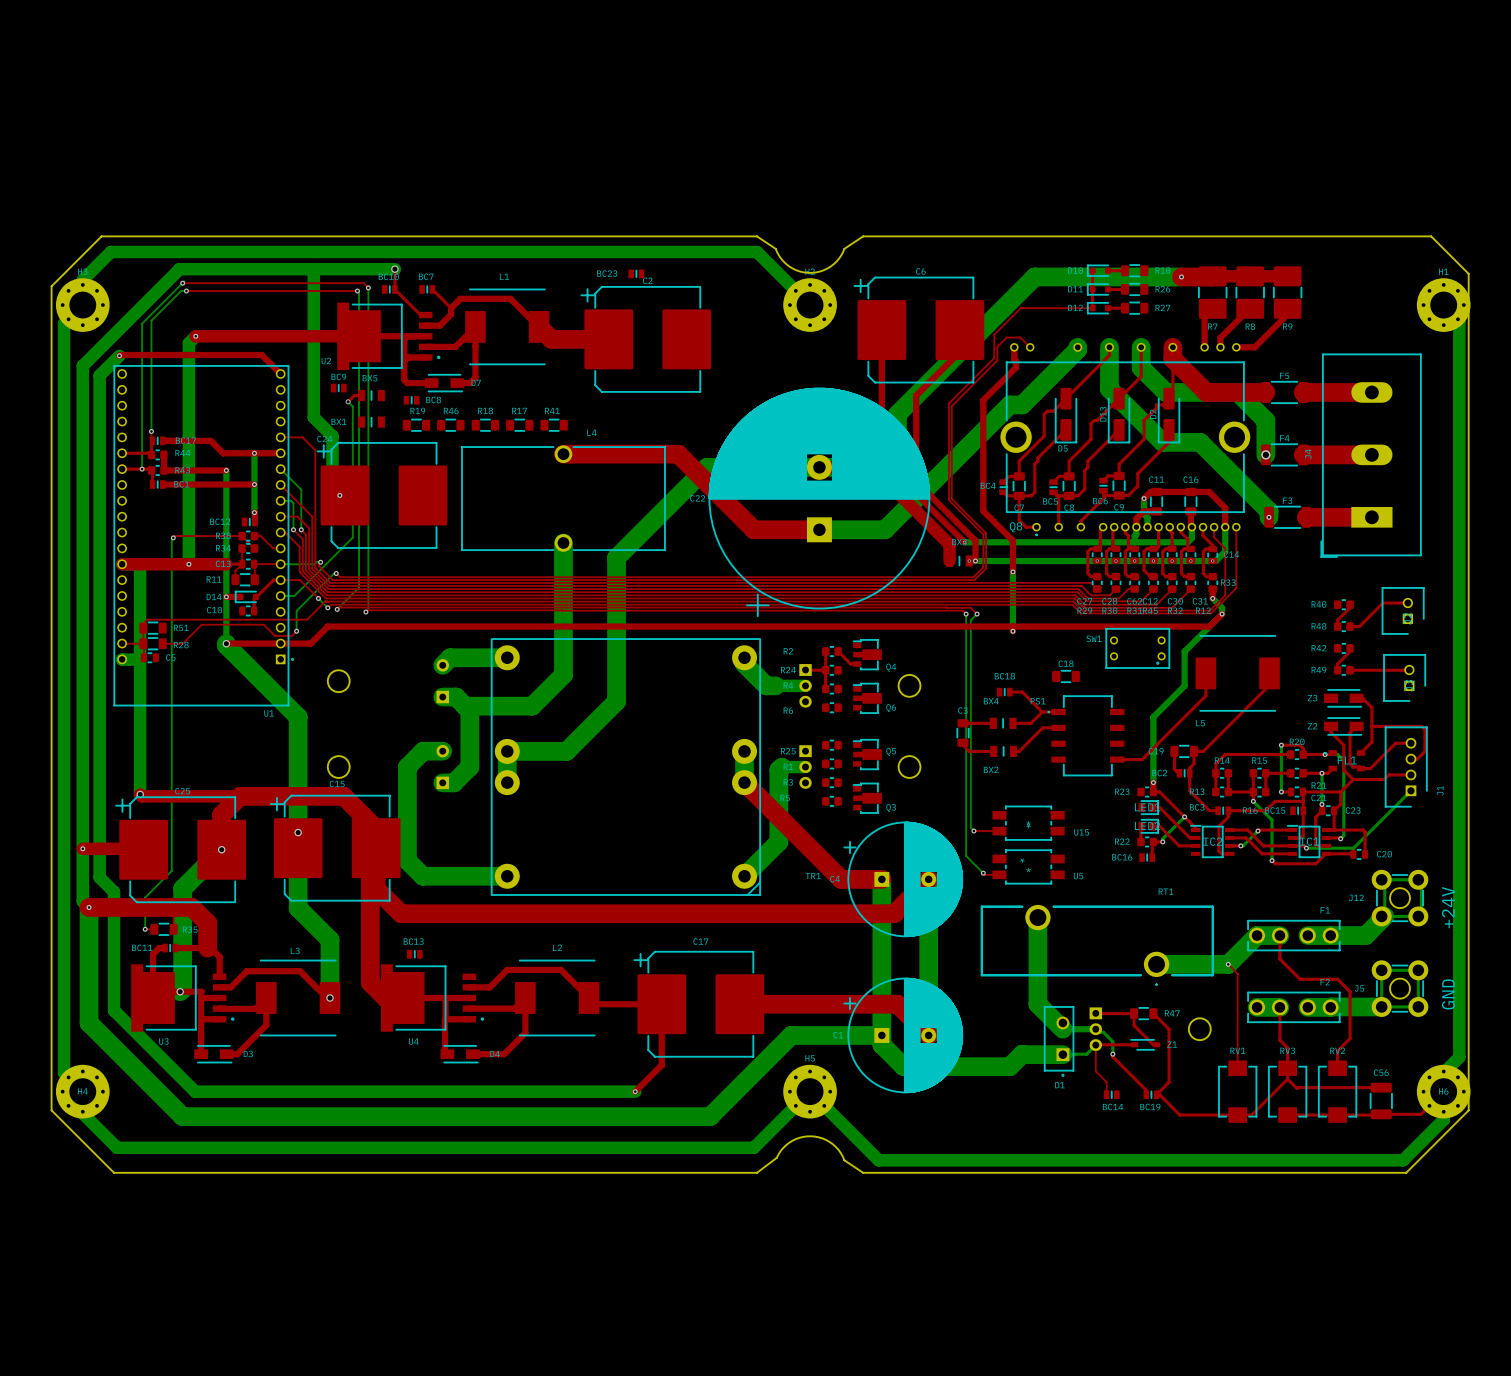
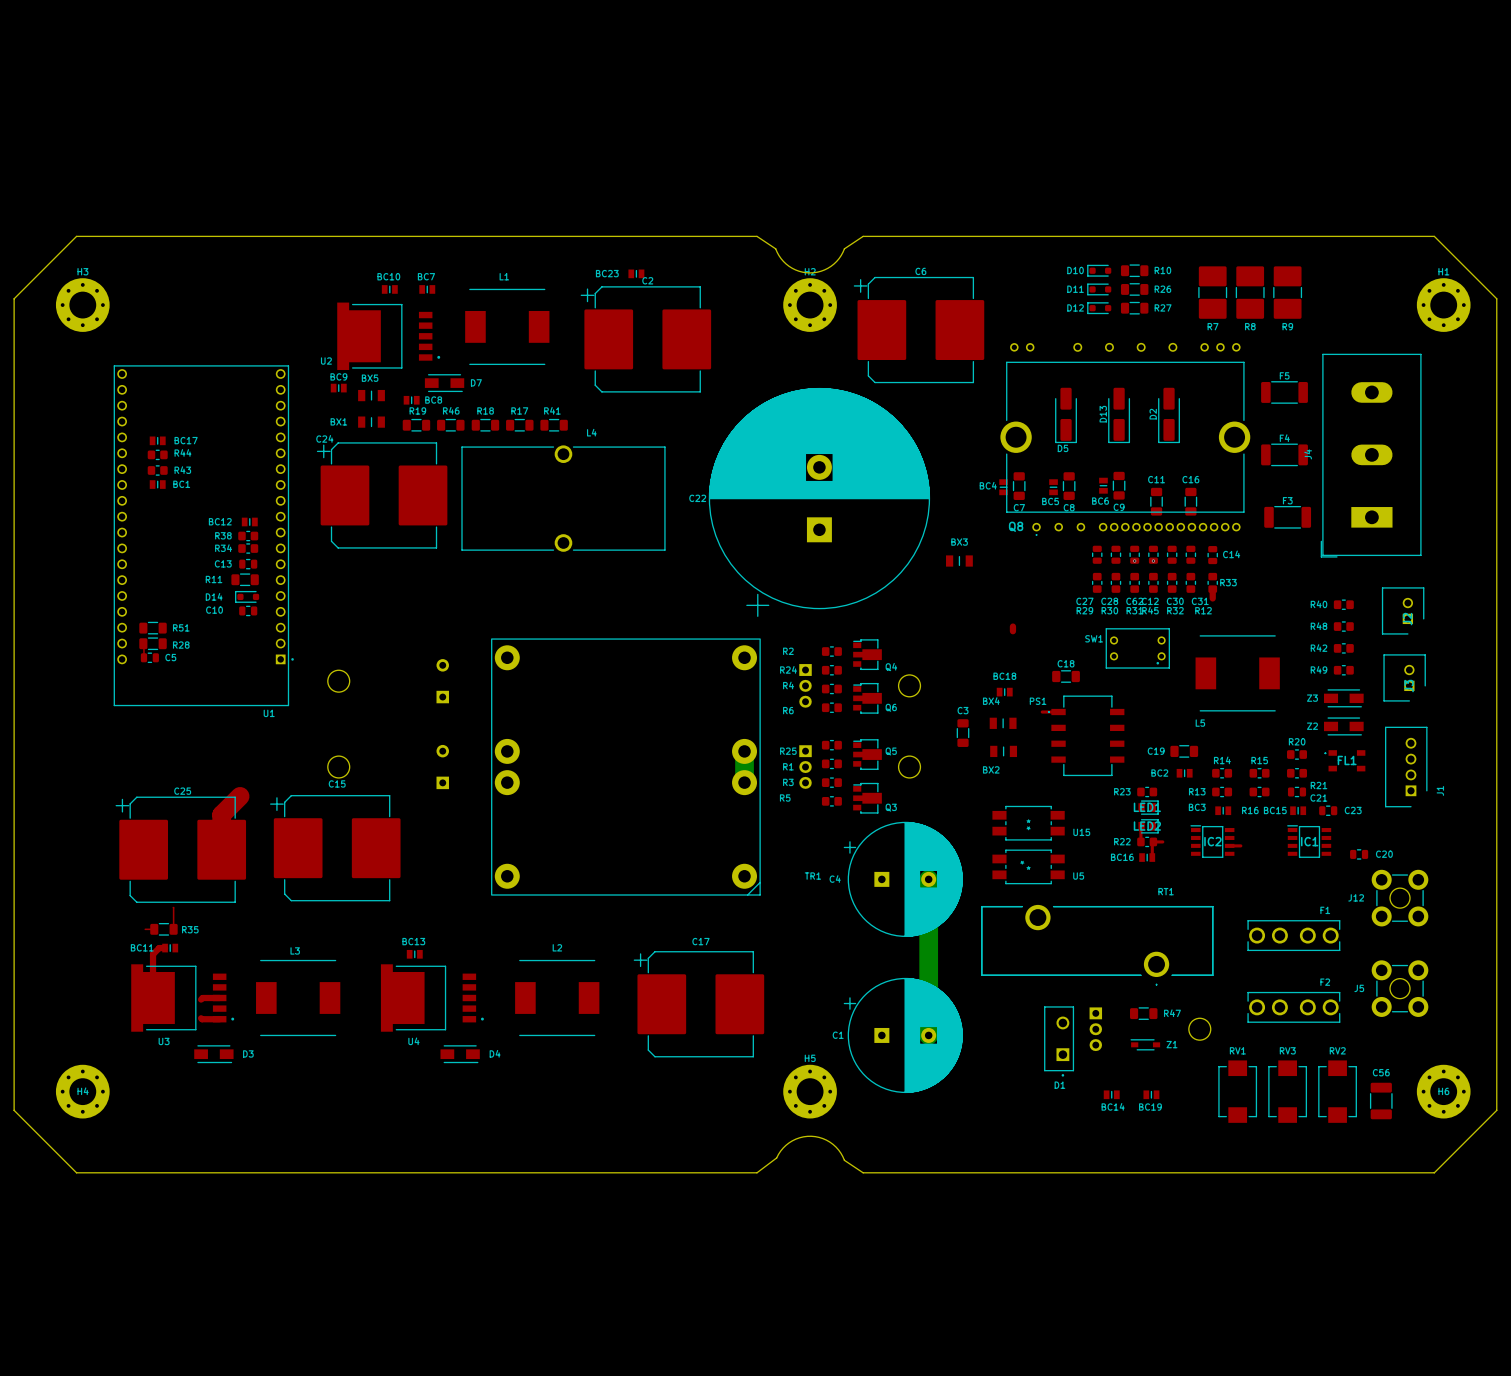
board edge: (101, 236) (51, 286) (51, 1110) (114, 1172) -> (101, 236) (76, 236) (14, 298) (14, 1110) (76, 1172) (114, 1172)
board edge: (1431, 236) (1468, 273) (1468, 1110) (1406, 1172) -> (1431, 236) (1434, 236) (1496, 298) (1496, 1110) (1434, 1172) (1406, 1172)
bottom track: (313, 269) (313, 417) (332, 436) (332, 488) (339, 495) -> none
top track: (394, 269) (394, 289) (420, 315) (425, 315) -> none
bottom track: (394, 269) (179, 269) (82, 365) (82, 901) (89, 907) (89, 1022) (182, 1116) (710, 1116) (791, 1035) (881, 1035) -> none
via: (394, 269) -> none
top track: (1092, 270) (1092, 308) (1020, 308) (994, 334) (994, 358) (948, 403) (948, 500) (983, 534) (983, 567) (973, 577) (339, 577) (336, 573) -> none
top track: (1108, 270) (1125, 270) -> none
bottom track: (1181, 276) (1034, 276) (897, 414) (897, 451) (881, 467) (707, 467) (616, 557) (616, 701) (566, 751) (507, 751) (507, 782) -> none
via: (1181, 276) -> none
top track: (1287, 276) (1181, 276) -> none
top track: (182, 283) (363, 283) (368, 287) -> none
bottom track: (182, 283) (184, 281) (142, 323) (142, 469) -> none
via: (182, 283) -> none
bottom track: (368, 287) (368, 609) (365, 612) -> none
via: (368, 287) -> none
top track: (432, 289) (451, 308) -> none
top track: (1108, 289) (1125, 289) -> none
top track: (186, 291) (357, 291) -> none
bottom track: (186, 291) (181, 291) (151, 320) (151, 431) -> none
via: (186, 291) -> none
bottom track: (357, 291) (359, 292) (359, 587) (337, 609) -> none
via: (357, 291) -> none
bottom track: (810, 305) (757, 251) (110, 251) (82, 280) (82, 305) (64, 323) (64, 1072) (82, 1091) (82, 1113) (117, 1147) (753, 1147) (810, 1091) (878, 1160) (1403, 1160) (1443, 1119) (1443, 1072) (1459, 1057) (1459, 320) (1443, 305) -> none
top track: (451, 308) (460, 298) (510, 298) (551, 339) (608, 339) -> none
top track: (451, 308) (451, 314) (439, 325) (425, 325) -> none
top track: (1108, 308) (1125, 308) -> none
top track: (1212, 308) (1204, 316) (1204, 347) -> none
top track: (1250, 308) (1220, 337) (1220, 347) -> none
top track: (1287, 308) (1287, 314) (1254, 347) (1236, 347) -> none
top track: (881, 330) (881, 459) (964, 542) -> none
top track: (959, 330) (959, 351) (916, 395) (916, 481) (975, 540) (975, 561) -> none
top track: (195, 336) (425, 336) -> none
bottom track: (195, 336) (188, 343) (188, 564) -> none
via: (195, 336) -> none
top track: (407, 336) (404, 339) (404, 379) (407, 383) (431, 383) -> none
top track: (425, 346) (455, 346) (475, 326) (475, 377) (469, 383) (457, 383) -> none
top track: (1014, 347) (1016, 367) (983, 400) (983, 511) (1012, 540) (1012, 571) -> none
top track: (1030, 347) (1020, 337) (1006, 337) (997, 346) (997, 360) (951, 406) (951, 498) (986, 533) (986, 568) (974, 580) (332, 580) (318, 566) (320, 562) -> none
bottom track: (1077, 347) (1077, 349) (1022, 404) (1009, 404) (884, 529) (819, 529) -> none
top track: (1109, 347) (1109, 355) (1053, 411) (1047, 411) (1044, 414) (1044, 436) (1019, 461) (1019, 476) (1009, 476) (1003, 482) -> none
bottom track: (1109, 347) (1109, 389) (1162, 442) (1200, 442) (1268, 511) (1268, 517) -> none
top track: (1141, 347) (1141, 376) (1097, 420) (1090, 423) (1090, 439) (1069, 461) (1069, 476) (1059, 476) (1053, 482) -> none
bottom track: (1141, 347) (1141, 367) (1165, 392) (1237, 392) (1265, 420) (1265, 454) -> none
top track: (119, 355) (261, 355) (280, 373) -> none
bottom track: (119, 355) (99, 375) (99, 877) (114, 891) (114, 1010) (195, 1091) (635, 1091) -> none
via: (119, 355) -> none
top track: (425, 357) (408, 357) (404, 361) -> none
top track: (1265, 392) (1206, 392) (1172, 358) (1172, 347) (1172, 391) (1162, 404) (1156, 404) (1156, 408) (1144, 420) (1144, 439) (1119, 464) (1119, 475) (1108, 475) (1103, 480) -> none
top track: (1303, 392) (1371, 392) -> none
top track: (361, 395) (354, 395) (348, 401) -> none
bottom track: (348, 401) (352, 406) (352, 537) (294, 595) (280, 595) -> none
via: (348, 401) -> none
top track: (1066, 429) (1037, 458) (1034, 464) (1034, 492) (1031, 495) (1007, 495) (1003, 492) -> none
top track: (1119, 429) (1087, 461) (1087, 467) (1084, 470) (1084, 489) (1078, 495) (1057, 495) (1053, 492) -> none
top track: (1169, 429) (1169, 442) (1137, 473) (1137, 486) (1128, 495) (1103, 495) (1103, 490) -> none
top track: (151, 431) (151, 454) (149, 453) (122, 453) -> none
via: (151, 431) -> none
top track: (280, 437) (302, 437) (315, 450) (315, 567) (330, 582) (1090, 582) (1097, 589) -> none
top track: (162, 440) (210, 440) (223, 453) -> none
top track: (223, 453) (280, 453) -> none
bottom track: (254, 453) (254, 512) -> none
via: (254, 453) -> none
top track: (163, 454) (163, 470) (226, 470) -> none
top track: (563, 454) (678, 454) (753, 529) (819, 529) -> none
via: (1265, 454) -> none
top track: (1303, 454) (1371, 454) -> none
top track: (819, 467) (872, 467) (949, 544) (949, 561) -> none
top track: (122, 469) (150, 469) (152, 471) (152, 484) -> none
via: (142, 469) -> none
bottom track: (280, 469) (301, 489) (301, 529) -> none
bottom track: (226, 470) (226, 645) (298, 717) (298, 908) (330, 939) (330, 998) -> none
via: (226, 470) -> none
top track: (162, 484) (254, 484) -> none
via: (254, 484) -> none
top track: (280, 484) (312, 516) (312, 568) (329, 585) (1081, 585) (1090, 595) (1109, 595) (1115, 589) -> none
via: (339, 495) -> none
top track: (1019, 495) (1019, 520) (1025, 527) (1036, 527) -> none
top track: (1059, 495) (1058, 527) -> none
top track: (1106, 495) (1080, 521) (1080, 527) -> none
top track: (1144, 498) (1150, 491) (1209, 491) (1225, 507) (1225, 527) -> none
bottom track: (1144, 498) (1144, 514) (1147, 517) (1147, 527) -> none
via: (1144, 498) -> none
bottom track: (280, 500) (291, 500) (293, 503) (293, 529) -> none
top track: (1156, 511) (1143, 511) (1136, 518) (1136, 527) -> none
top track: (1190, 511) (1191, 527) -> none
top track: (254, 512) (254, 521) -> none
via: (254, 512) -> none
top track: (280, 516) (297, 516) (309, 528) (309, 569) (328, 589) (1078, 589) (1087, 598) (1119, 598) (1128, 589) (1134, 589) -> none
via: (1268, 517) -> none
top track: (1306, 517) (1371, 517) -> none
top track: (1103, 527) (1100, 529) (1100, 548) -> none
top track: (1114, 527) (1112, 545) (1115, 548) (1109, 548) (1106, 551) (1106, 573) (1109, 576) (1115, 576) -> none
top track: (1125, 527) (1125, 532) (1128, 536) (1128, 545) (1131, 548) -> none
bottom track: (1136, 527) (1134, 542) -> none
top track: (1158, 527) (1158, 546) (1156, 548) (1147, 548) (1144, 551) (1144, 570) (1150, 576) (1156, 576) -> none
top track: (1169, 527) (1172, 532) (1172, 548) (1165, 548) (1162, 551) (1162, 573) (1165, 576) (1172, 576) -> none
top track: (1180, 527) (1180, 532) (1187, 539) (1187, 548) -> none
bottom track: (1191, 527) (1191, 538) (1187, 542) (964, 542) -> none
top track: (1203, 527) (1203, 535) (1212, 545) (1212, 549) (1205, 549) (1203, 551) (1203, 573) (1206, 576) (1212, 576) -> none
top track: (1214, 527) (1214, 537) (1225, 548) (1225, 595) (1209, 610) (1082, 610) (1073, 601) (325, 601) -> none
bottom track: (1225, 527) (1225, 551) (1215, 561) (969, 561) -> none
top track: (1236, 527) (1236, 588) (1211, 613) (1081, 613) (1072, 604) (330, 604) (327, 607) -> none
top track: (293, 529) (302, 539) (302, 571) (326, 595) (1075, 595) (1084, 604) (1156, 604) (1172, 589) -> none
via: (293, 529) -> none
top track: (301, 529) (305, 534) (305, 570) (327, 592) (1077, 592) (1086, 601) (1141, 601) (1153, 589) -> none
via: (301, 529) -> none
top track: (280, 532) (285, 532) (299, 546) (299, 572) (325, 598) (1074, 598) (1084, 607) (1172, 607) (1190, 589) -> none
top track: (254, 536) (260, 536) (273, 548) (280, 548) -> none
top track: (173, 537) (175, 536) (241, 536) (254, 548) -> none
bottom track: (173, 537) (171, 539) (171, 870) (145, 897) (145, 929) -> none
via: (173, 537) -> none
bottom track: (563, 542) (563, 674) (532, 706) (465, 706) -> none
via: (964, 542) -> none
top track: (241, 548) (242, 564) -> none
top track: (1097, 548) (1090, 548) (1087, 551) (1087, 573) (1090, 576) (1097, 576) -> none
top track: (1134, 548) (1128, 548) (1125, 551) (1125, 573) (1128, 576) (1134, 576) -> none
top track: (1190, 548) (1184, 548) (1181, 551) (1181, 573) (1184, 576) (1190, 576) -> none
via: (969, 561) -> none
via: (975, 561) -> none
via: (1097, 561) -> none
via: (1115, 561) -> none
via: (1172, 561) -> none
via: (1190, 561) -> none
via: (1212, 561) -> none
bottom track: (320, 562) (314, 564) (280, 564) -> none
via: (320, 562) -> none
bottom track: (122, 564) (137, 564) (140, 567) (140, 794) -> none
via: (188, 564) -> none
top track: (242, 564) (122, 564) -> none
top track: (242, 564) (235, 571) (235, 579) -> none
top track: (280, 564) (254, 564) (254, 579) -> none
bottom track: (1012, 571) (1012, 631) -> none
via: (1012, 571) -> none
bottom track: (336, 573) (334, 573) (296, 610) (296, 631) -> none
via: (336, 573) -> none
top track: (226, 596) (240, 596) -> none
via: (226, 596) -> none
top track: (318, 598) (300, 580) (273, 580) (254, 598) (254, 610) -> none
bottom track: (318, 598) (327, 607) -> none
via: (318, 598) -> none
bottom track: (1212, 598) (1222, 607) (1222, 614) (1184, 651) (1184, 685) (1153, 717) (1153, 782) -> none
via: (1212, 598) -> none
top track: (325, 601) (307, 619) (147, 619) (143, 623) (143, 643) (122, 643) -> none
top track: (1407, 603) (1382, 603) (1359, 626) (1350, 626) -> none
top track: (1350, 604) (1350, 607) (1337, 620) (1337, 626) -> none
via: (327, 607) -> none
top track: (337, 609) (338, 607) (947, 607) (970, 607) (977, 614) -> none
via: (337, 609) -> none
top track: (365, 612) (367, 610) (962, 610) (966, 614) -> none
via: (365, 612) -> none
bottom track: (966, 614) (966, 855) (983, 873) -> none
via: (966, 614) -> none
bottom track: (977, 614) (970, 620) (970, 827) (973, 831) -> none
via: (977, 614) -> none
top track: (1222, 614) (1209, 626) (327, 626) (310, 643) (226, 643) -> none
via: (1222, 614) -> none
top track: (296, 631) (291, 635) (275, 635) (263, 624) (201, 624) (182, 643) (162, 643) -> none
via: (296, 631) -> none
via: (1012, 631) -> none
via: (226, 643) -> none
top track: (1350, 648) (1350, 651) (1337, 664) (1337, 670) -> none
top track: (825, 651) (825, 688) -> none
top track: (838, 651) (850, 664) (857, 664) -> none
bottom track: (507, 657) (450, 657) (442, 665) -> none
bottom track: (744, 657) (744, 664) (766, 685) (805, 685) -> none
bottom track: (122, 659) (140, 659) -> none
top track: (805, 670) (825, 670) -> none
top track: (1409, 670) (1350, 670) -> none
top track: (1205, 673) (1205, 695) (1142, 759) (1117, 759) -> none
top track: (1269, 673) (1269, 685) (1203, 751) (1194, 751) (1194, 763) (1189, 768) (1189, 790) (1209, 810) (1218, 810) -> none
top track: (1009, 692) (1022, 692) (1042, 712) (1030, 723) (1012, 723) -> none
bottom track: (442, 697) (456, 697) (469, 710) (469, 767) (453, 782) (442, 782) -> none
top track: (1356, 698) (1362, 698) (1371, 707) (1371, 742) (1361, 752) -> none
top track: (963, 723) (993, 723) -> none
top track: (1331, 726) (1331, 732) (1343, 745) (1343, 770) (1353, 779) -> none
top track: (1356, 726) (1350, 732) (1350, 763) (1353, 767) (1370, 768) (1395, 743) (1410, 743) -> none
top track: (1371, 726) (1421, 726) (1424, 729) (1424, 751) (1417, 759) (1410, 759) -> none
top track: (1058, 727) (1042, 727) (1019, 751) (1013, 751) -> none
top track: (963, 742) (969, 751) (993, 751) -> none
top track: (1281, 745) (1300, 745) (1303, 748) (1303, 754) (1332, 752) -> none
bottom track: (1281, 745) (1281, 791) -> none
via: (1281, 745) -> none
bottom track: (442, 751) (423, 751) (407, 767) (407, 860) (423, 876) (507, 876) -> none
top track: (1174, 751) (1174, 769) (1179, 773) -> none
top track: (1290, 754) (1225, 754) (1215, 763) (1215, 791) -> none
bottom track: (1325, 754) (1337, 754) (1343, 760) (1343, 835) (1340, 838) -> none
via: (1325, 754) -> none
bottom track: (805, 767) (781, 767) (778, 770) (778, 841) (744, 876) -> none
top track: (1332, 768) (1328, 773) (1303, 773) -> none
top track: (1228, 773) (1228, 791) (1253, 791) -> none
top track: (1253, 773) (1253, 801) -> none
top track: (1290, 773) (1265, 773) (1265, 791) -> none
bottom track: (1321, 773) (1321, 804) -> none
via: (1321, 773) -> none
top track: (1410, 774) (1389, 774) (1384, 779) (1353, 779) -> none
top track: (1353, 779) (1340, 791) -> none
top track: (744, 782) (841, 879) (881, 879) -> none
top track: (1153, 782) (1153, 791) (1159, 791) (1195, 830) -> none
via: (1153, 782) -> none
bottom track: (1410, 790) (1353, 848) (1306, 848) -> none
top track: (1281, 791) (1291, 791) -> none
via: (1281, 791) -> none
top track: (1340, 791) (1302, 791) (1303, 835) (1300, 837) (1292, 837) -> none
top track: (1340, 791) (1340, 804) (1334, 810) (1334, 830) -> none
top track: (140, 794) (142, 796) (343, 796) (376, 828) (376, 888) (401, 913) (894, 913) (928, 879) -> none
via: (140, 794) -> none
bottom track: (1253, 801) (1272, 820) (1272, 860) -> none
via: (1253, 801) -> none
top track: (1303, 801) (1275, 801) (1265, 810) (1228, 810) (1228, 816) (1218, 826) (1218, 851) (1221, 853) (1229, 853) -> none
top track: (1321, 804) (1322, 810) (1315, 817) (1315, 845) (1326, 845) -> none
via: (1321, 804) -> none
top track: (1152, 807) (1159, 807) (1190, 837) (1195, 837) -> none
bottom track: (1184, 816) (1162, 838) (1162, 841) -> none
via: (1184, 816) -> none
top track: (1152, 826) (1159, 826) (1179, 845) (1195, 845) -> none
top track: (1229, 830) (1247, 830) (1263, 845) (1304, 845) (1306, 848) -> none
top track: (1292, 830) (1257, 831) -> none
top track: (1326, 830) (1363, 830) (1365, 832) (1365, 854) -> none
top track: (973, 831) (999, 831) -> none
via: (973, 831) -> none
bottom track: (1257, 831) (1240, 845) -> none
via: (1257, 831) -> none
via: (298, 832) -> none
top track: (1229, 837) (1246, 837) (1262, 853) (1292, 853) -> none
top track: (1326, 837) (1340, 838) -> none
via: (1340, 838) -> none
via: (1162, 841) -> none
via: (1240, 845) -> none
top track: (82, 848) (143, 850) -> none
via: (82, 848) -> none
top track: (376, 848) (370, 854) (370, 982) (385, 998) (469, 998) -> none
via: (1306, 848) -> none
bottom track: (221, 849) (182, 888) (182, 989) (180, 991) -> none
via: (221, 849) -> none
top track: (1353, 854) (1325, 853) (1315, 863) (1275, 863) (1272, 860) -> none
via: (1272, 860) -> none
top track: (983, 873) (984, 874) (999, 874) -> none
via: (983, 873) -> none
bottom track: (881, 879) (881, 1044) (903, 1066) (1009, 1066) (1022, 1054) (1086, 1054) (1095, 1045) -> none
top track: (89, 907) (192, 907) (207, 923) (207, 948) -> none
via: (89, 907) -> none
text: +24V (1448, 907) -> none
bottom track: (1384, 916) (1421, 916) (1421, 879) (1384, 879) (1384, 916) -> none
bottom track: (1384, 916) (1365, 935) (1307, 935) -> none
bottom track: (1037, 917) (1037, 1004) (1062, 1029) (1095, 1029) (1098, 1032) (1103, 1032) (1112, 1041) (1112, 1054) -> none
via: (145, 929) -> none
top track: (1279, 935) (1279, 958) (1300, 979) (1337, 979) (1350, 991) (1350, 1038) (1337, 1051) (1337, 1068) -> none
bottom track: (1279, 935) (1257, 935) (1228, 964) (1156, 964) -> none
top track: (175, 948) (210, 948) (219, 956) (219, 976) -> none
top track: (1228, 964) (1237, 973) (1237, 1068) -> none
via: (1228, 964) -> none
top track: (219, 987) (230, 987) (246, 971) (300, 971) (320, 991) -> none
top track: (469, 987) (489, 987) (507, 969) (560, 969) (597, 1004) (661, 1004) (661, 1065) (635, 1091) -> none
top track: (153, 991) (201, 991) (201, 1047) -> none
via: (180, 991) -> none
text: GND (1448, 994) -> none
via: (330, 998) -> none
top track: (444, 998) (445, 1019) -> none
top track: (739, 1004) (897, 1004) (928, 1035) -> none
bottom track: (1381, 1006) (1418, 1006) (1418, 970) (1381, 970) (1381, 1006) -> none
bottom track: (1381, 1006) (1307, 1007) -> none
bottom track: (1257, 1007) (1279, 1007) -> none
top track: (1279, 1007) (1279, 1040) (1287, 1047) (1287, 1079) -> none
top track: (219, 1008) (255, 1008) (266, 998) (266, 1025) (237, 1054) (226, 1054) -> none
top track: (469, 1008) (514, 1008) (525, 998) (525, 1032) (504, 1054) (472, 1054) -> none
top track: (1095, 1013) (1134, 1013) (1134, 1025) (1153, 1044) (1156, 1044) -> none
top track: (1153, 1013) (1169, 1029) (1169, 1082) (1156, 1094) (1159, 1094) (1179, 1115) (1251, 1115) (1287, 1079) -> none
top track: (445, 1019) (469, 1019) -> none
top track: (445, 1019) (444, 1051) (447, 1054) -> none
top track: (1134, 1044) (1095, 1045) (1095, 1071) (1106, 1082) (1106, 1094) -> none
top track: (1112, 1054) (1112, 1056) (1146, 1090) (1146, 1094) -> none
via: (1112, 1054) -> none
top track: (1287, 1079) (1297, 1088) (1381, 1087) -> none
via: (635, 1091) -> none
top track: (1443, 1091) (1421, 1114) (1287, 1115) -> none

